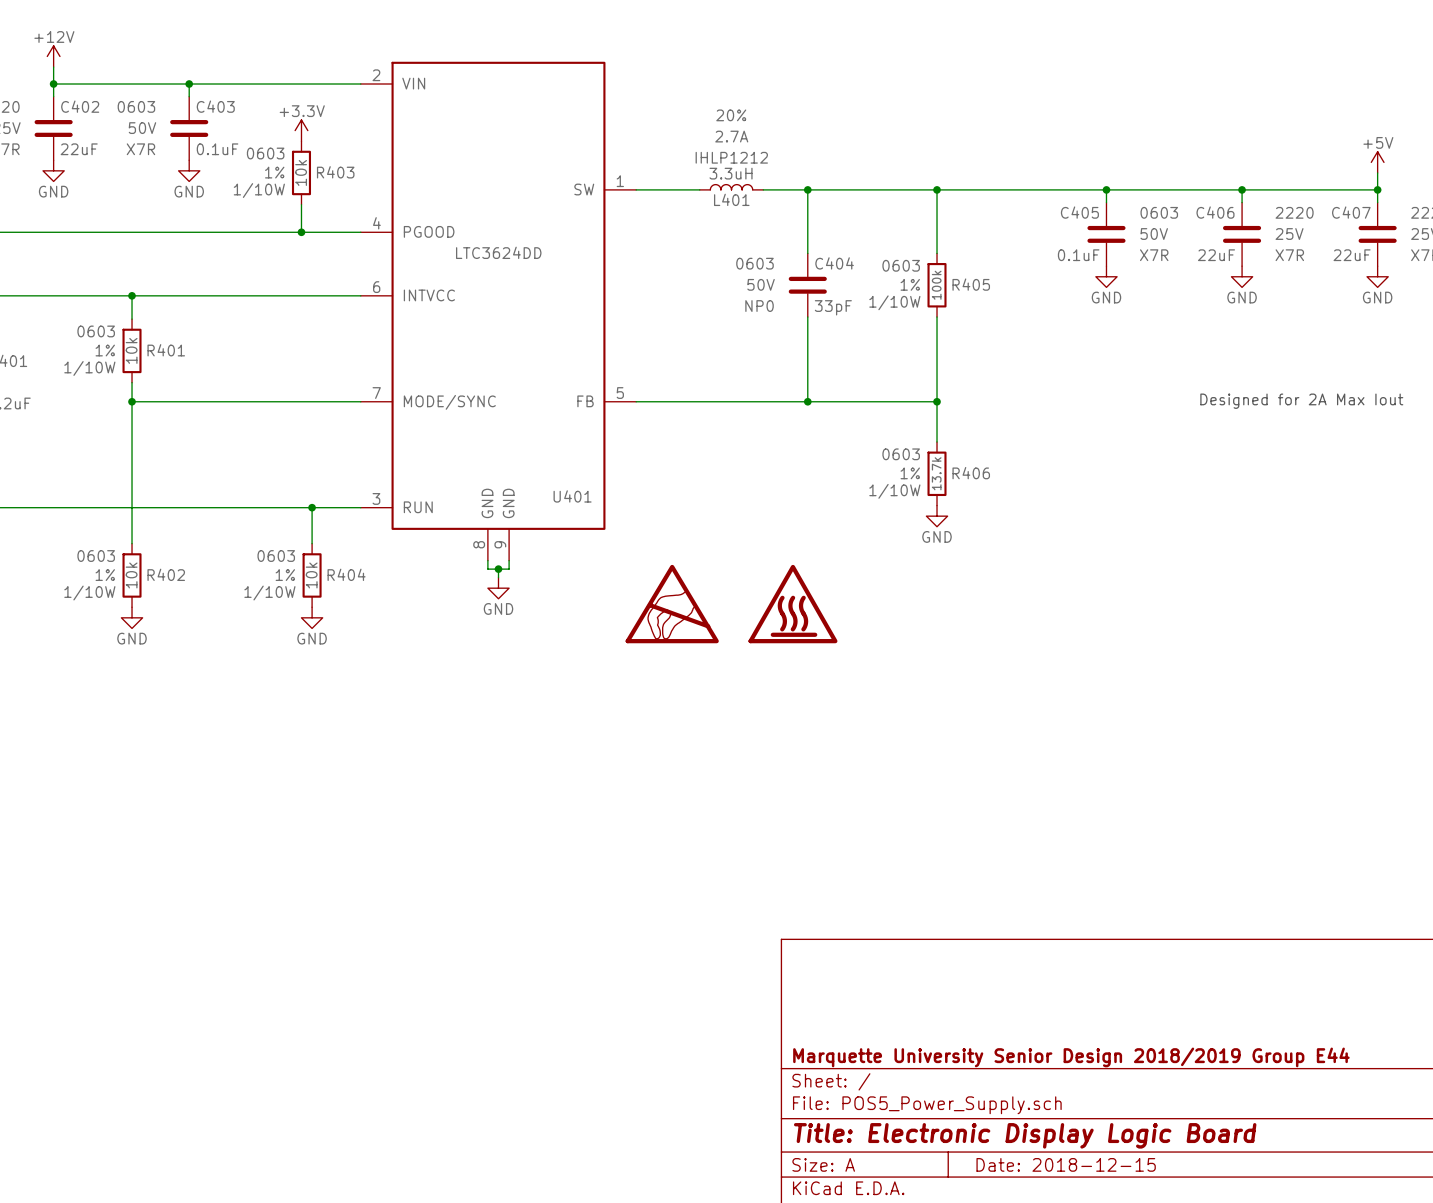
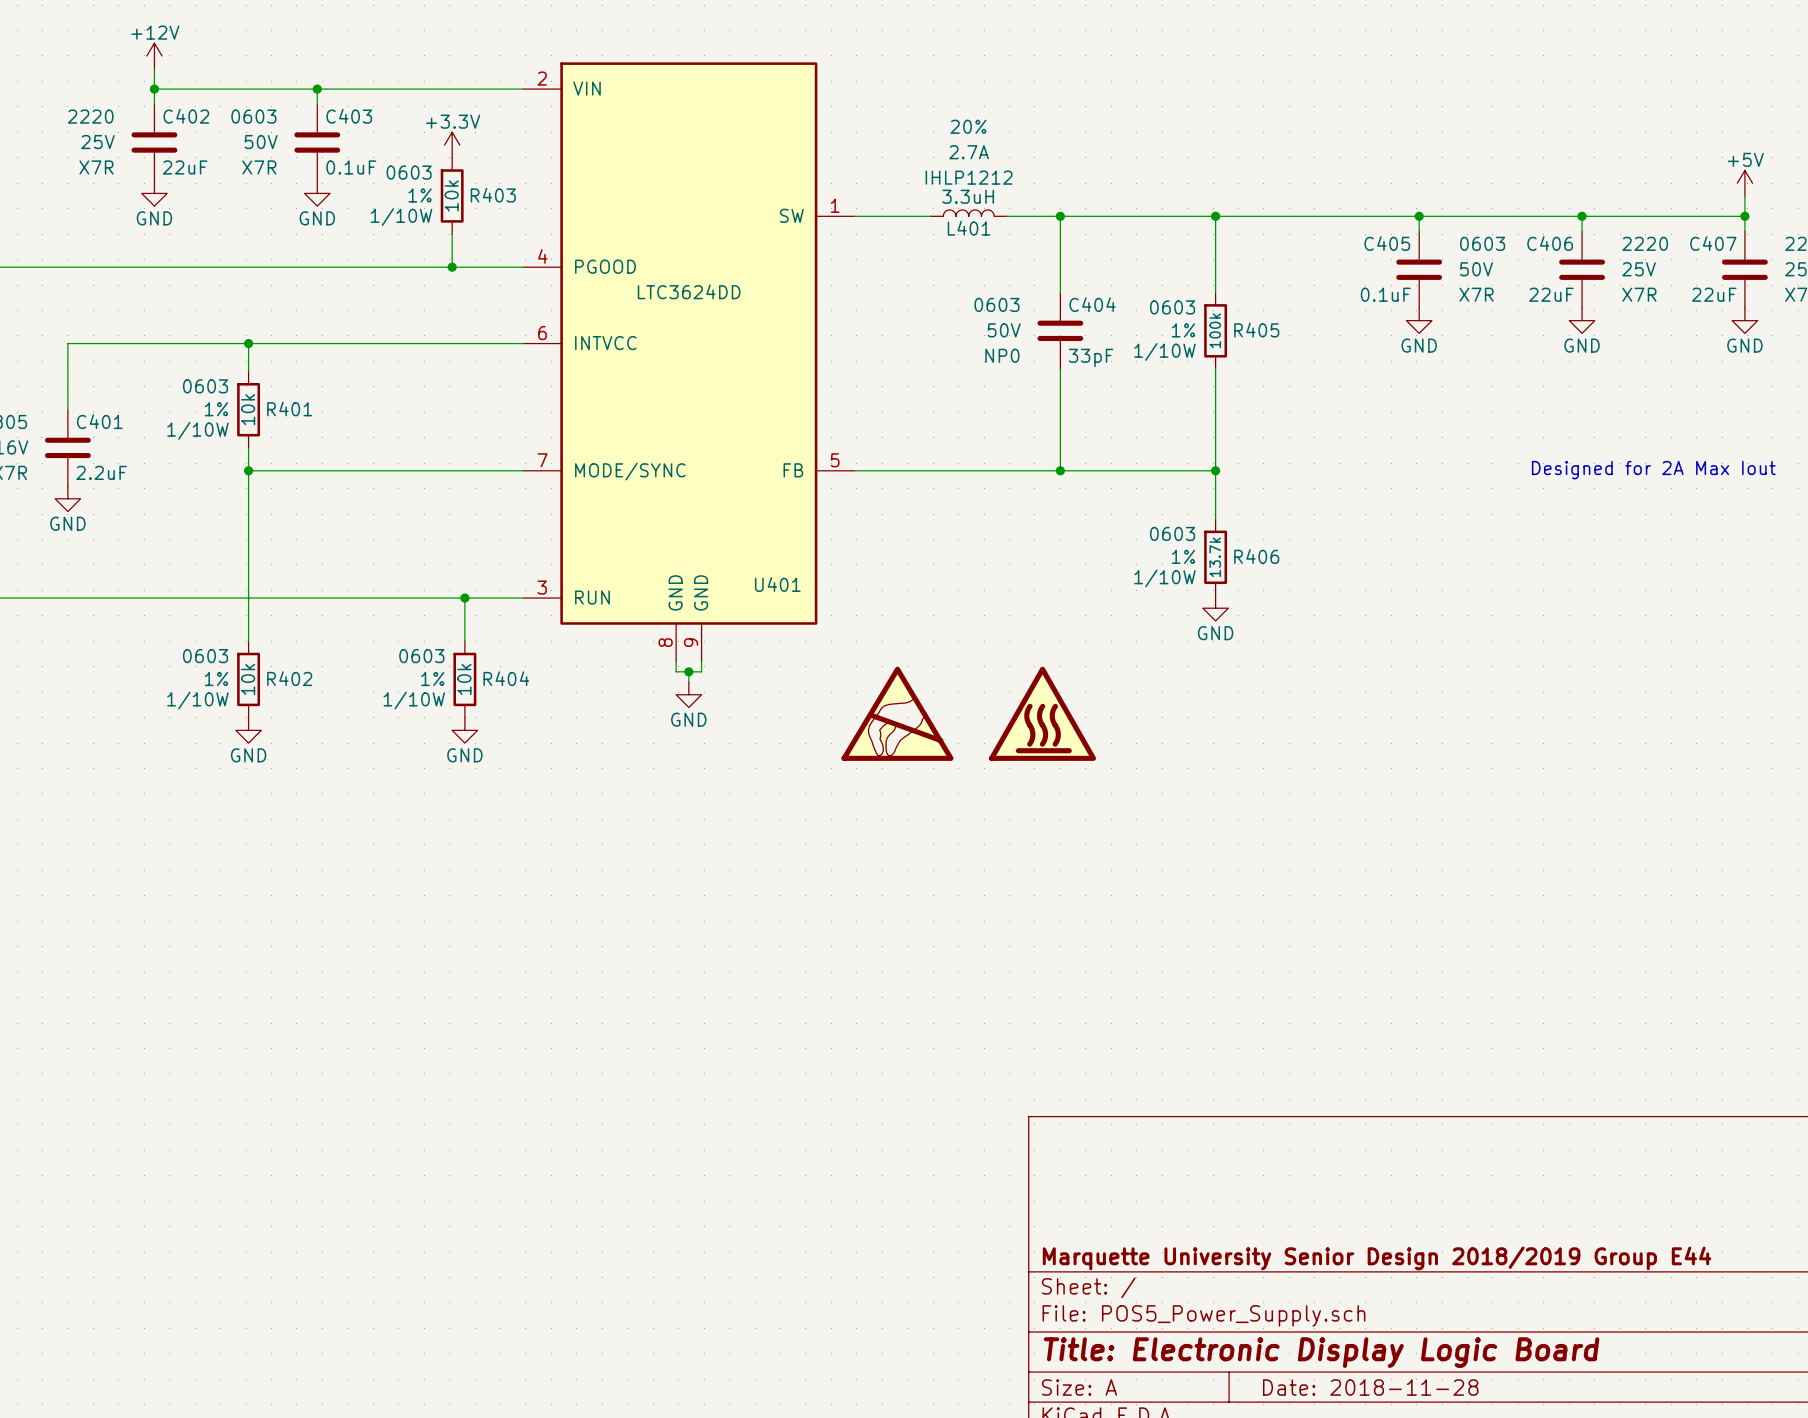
title block: Date: 2018-12-15 (1066, 1164) -> Date: 2018-11-28 (1370, 1387)

